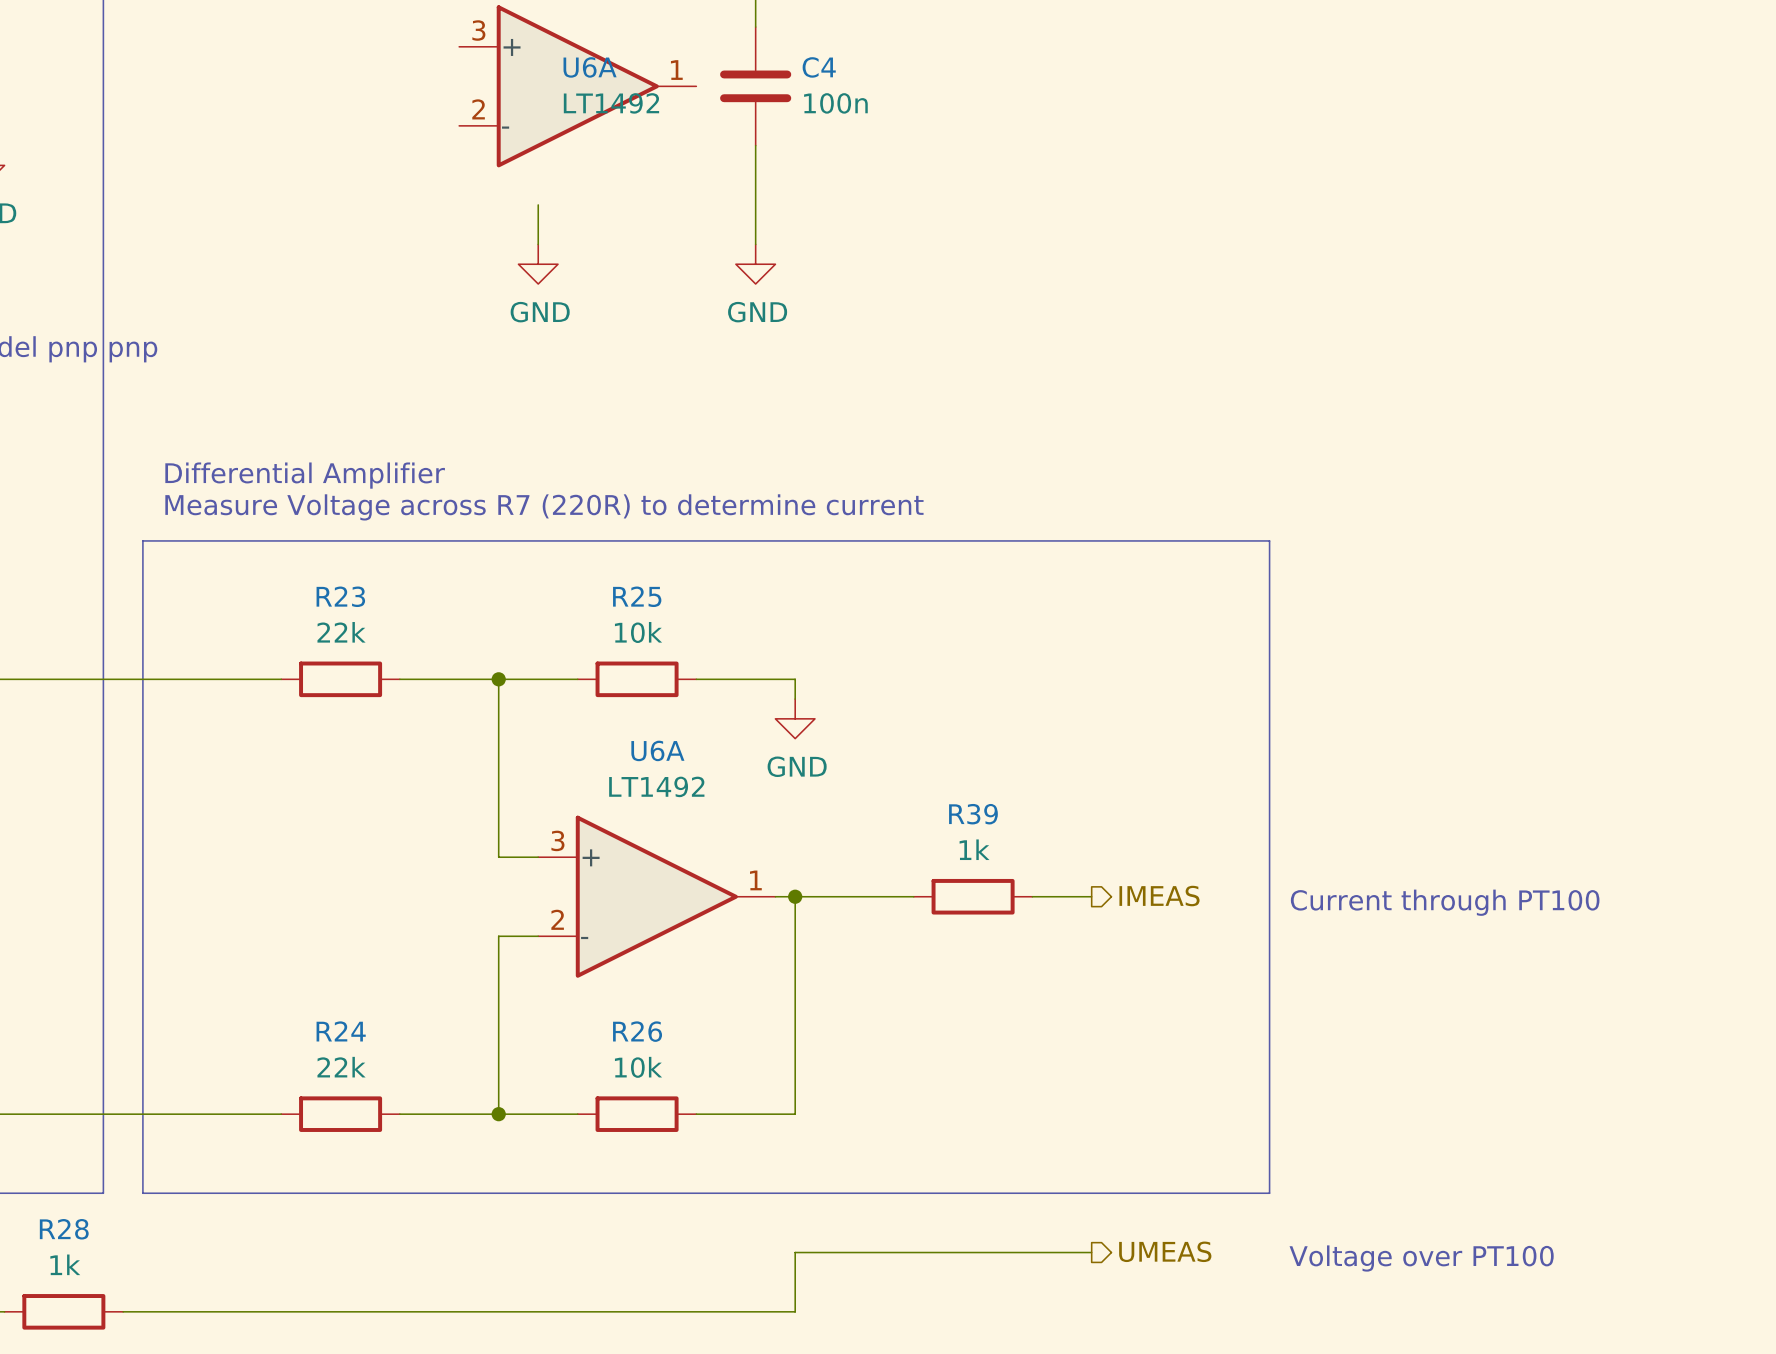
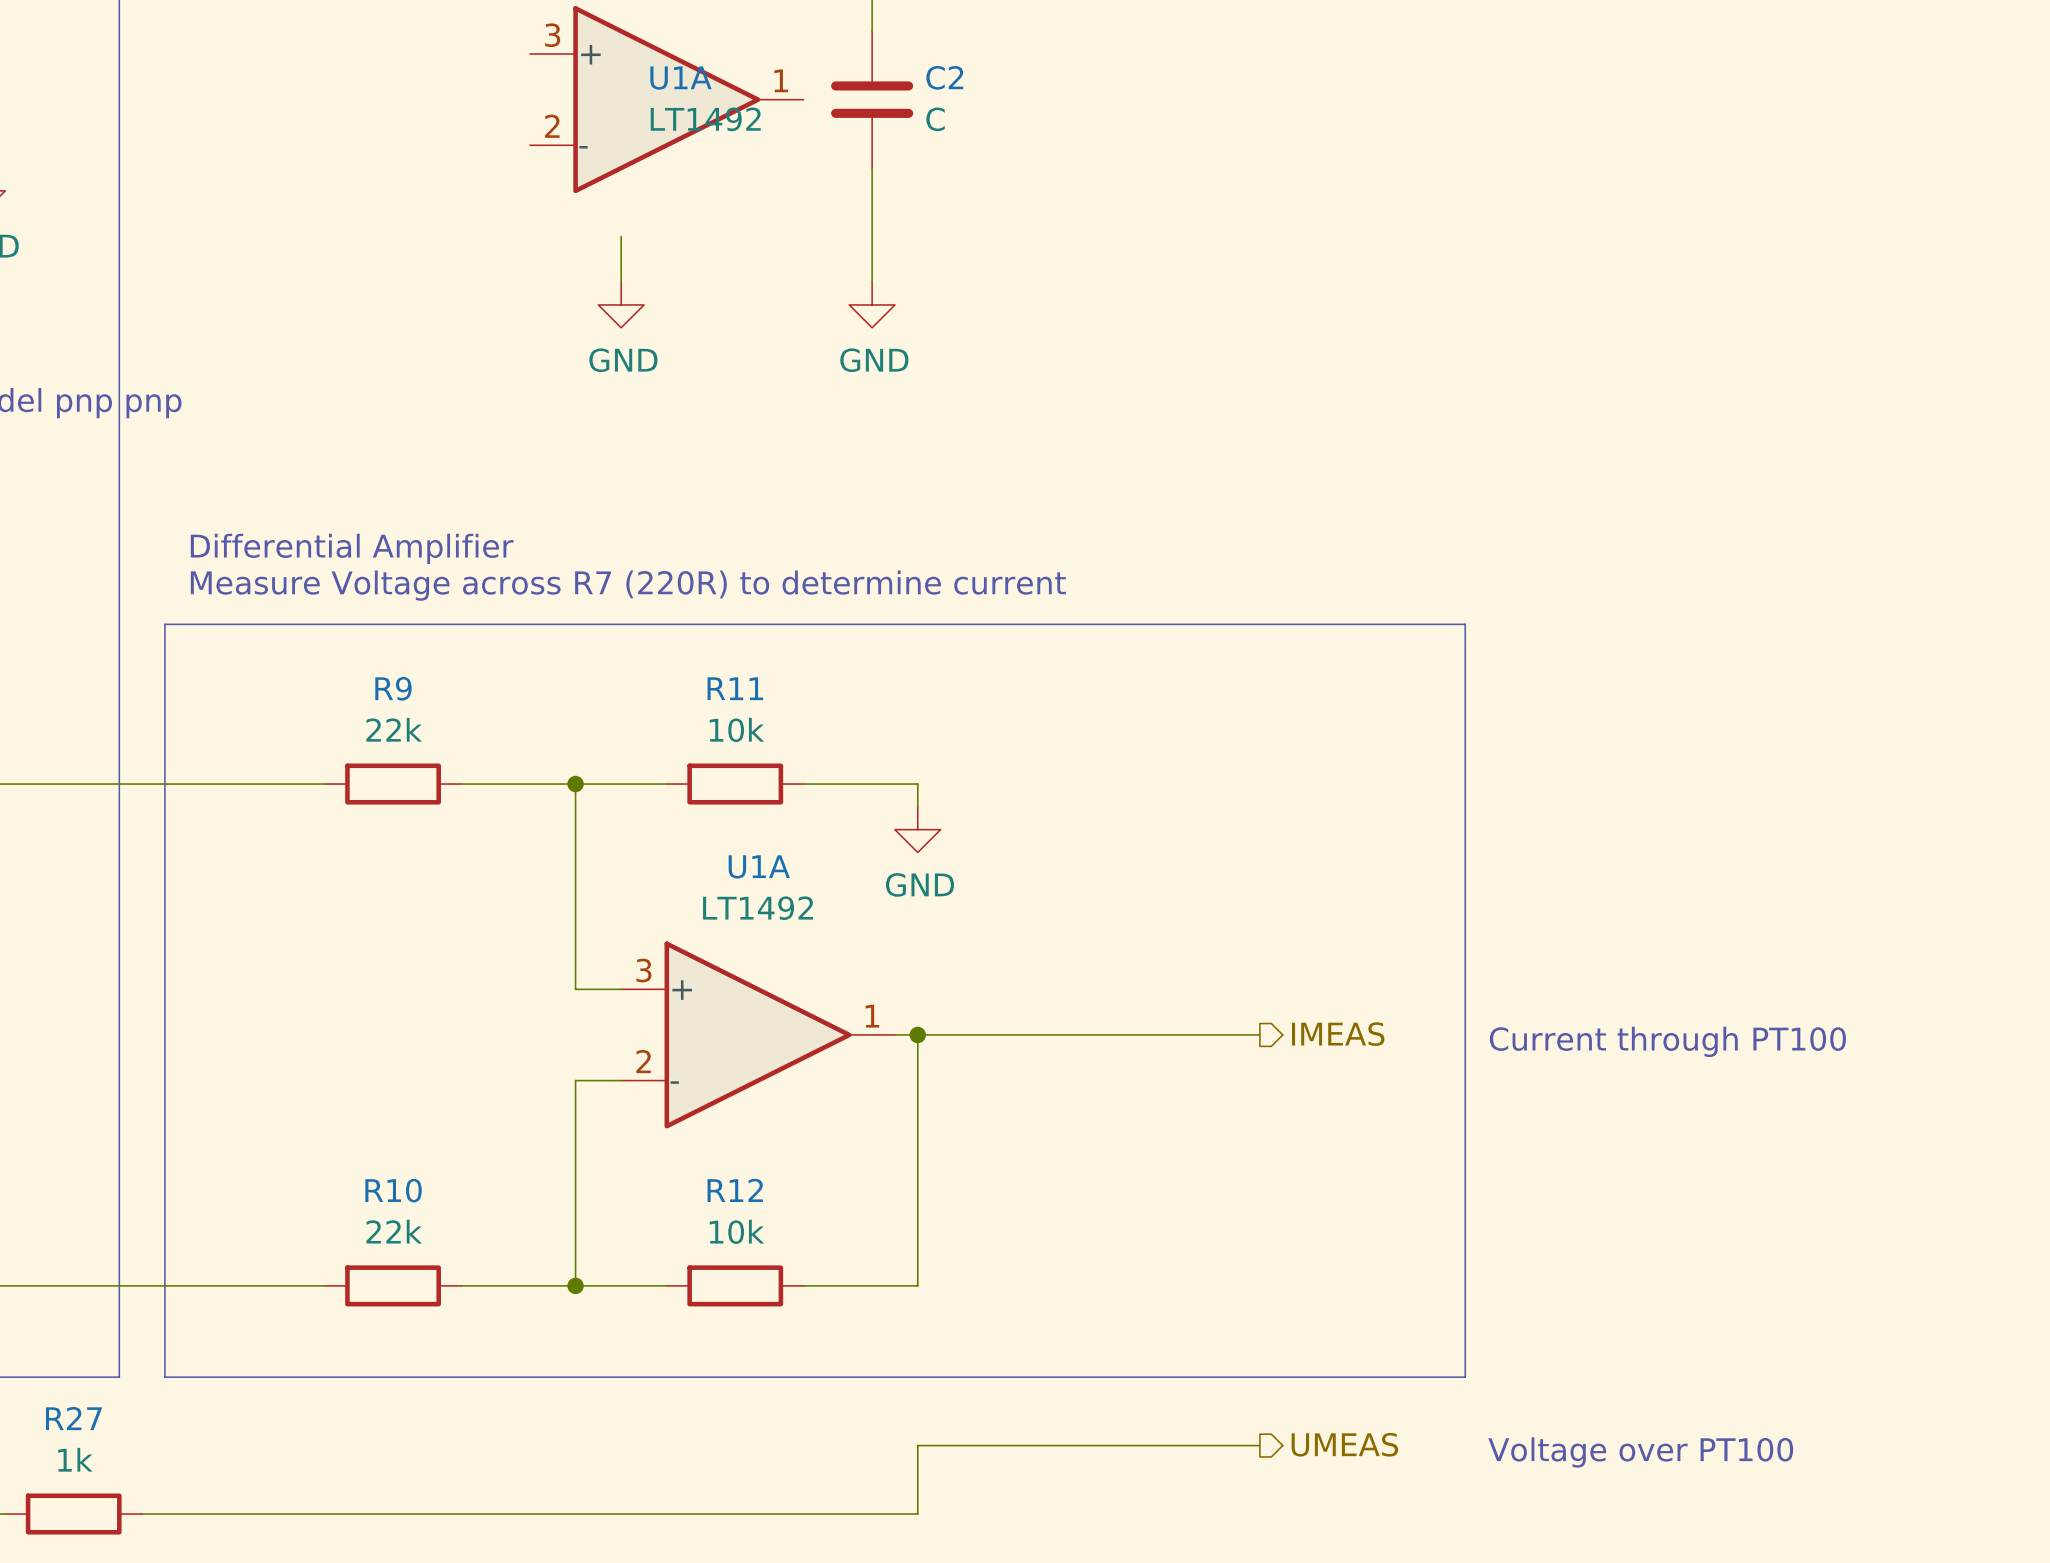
U6A name: U6A (590, 67) -> U1A (680, 78)
C4 name: C4 (819, 67) -> C2 (944, 77)
C4 value: 100n (835, 103) -> C (935, 119)
R23 name: R23 (340, 596) -> R9 (393, 688)
R25 name: R25 (637, 596) -> R11 (735, 688)
U6A name: U6A (657, 750) -> U1A (759, 866)
wire: none -> (1054, 1034) (1191, 1034)
R39: 1k (973, 896) -> none
R24 name: R24 (341, 1031) -> R10 (393, 1190)
R26 name: R26 (637, 1031) -> R12 (735, 1190)
R28 name: R28 (64, 1229) -> R27 (73, 1418)

